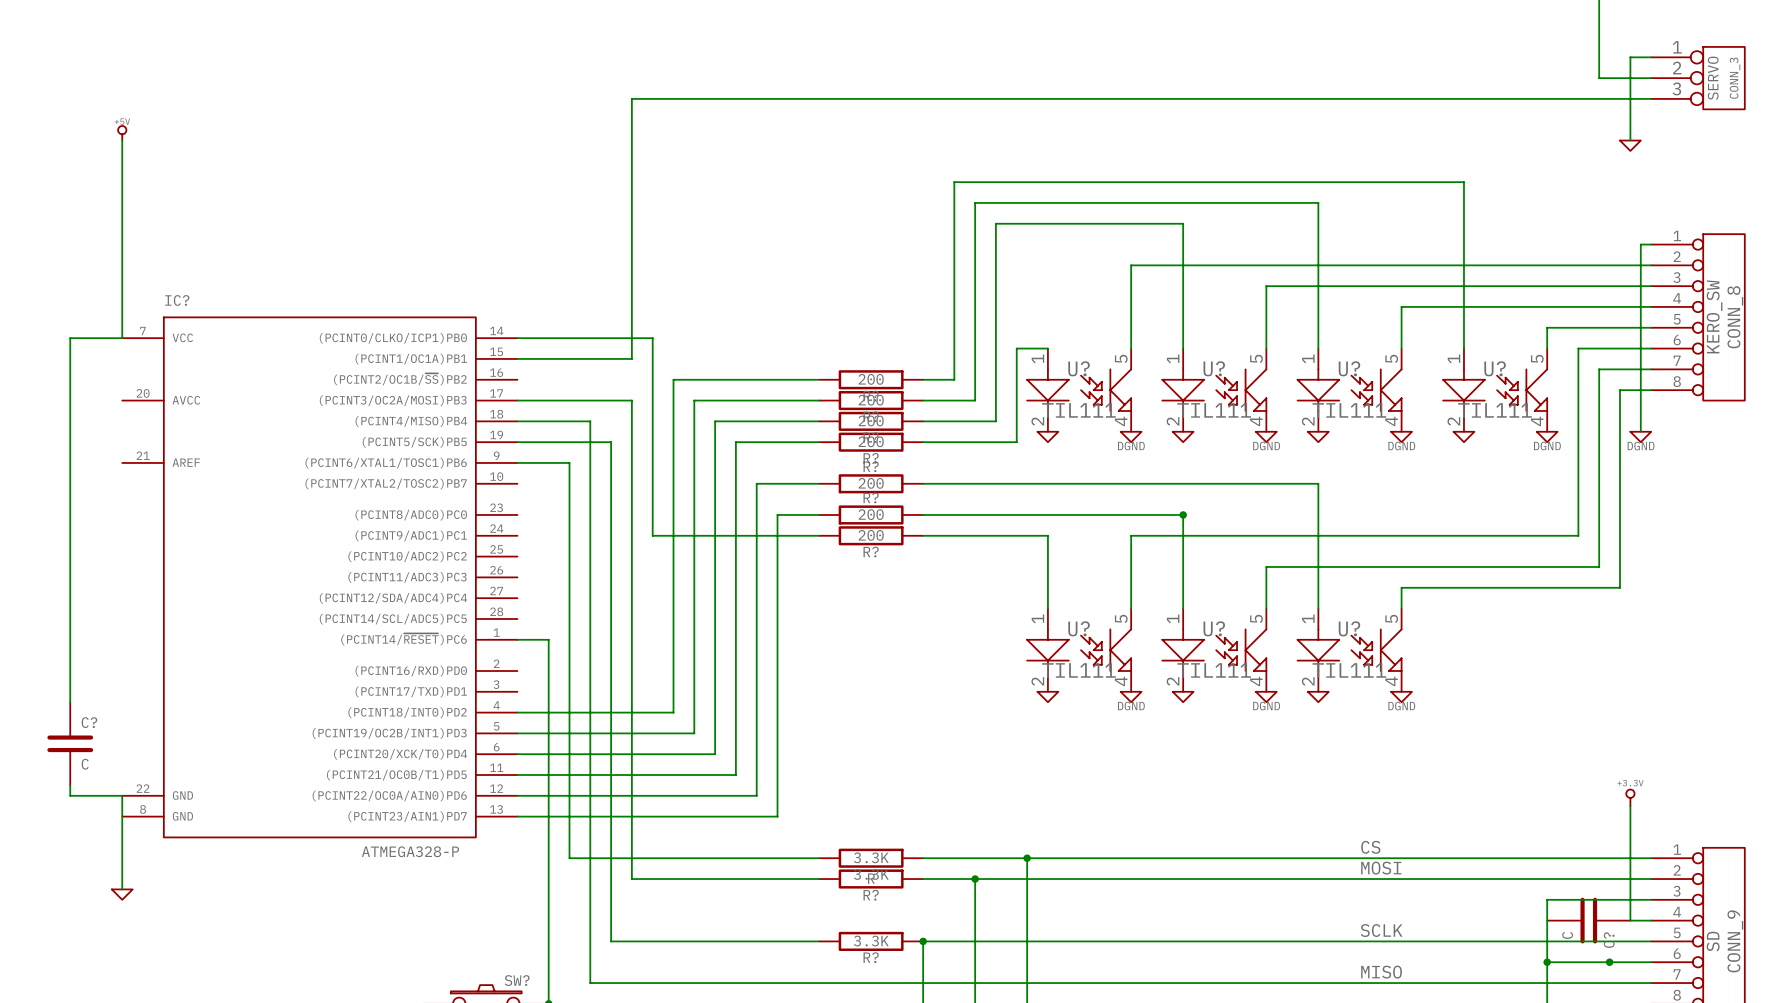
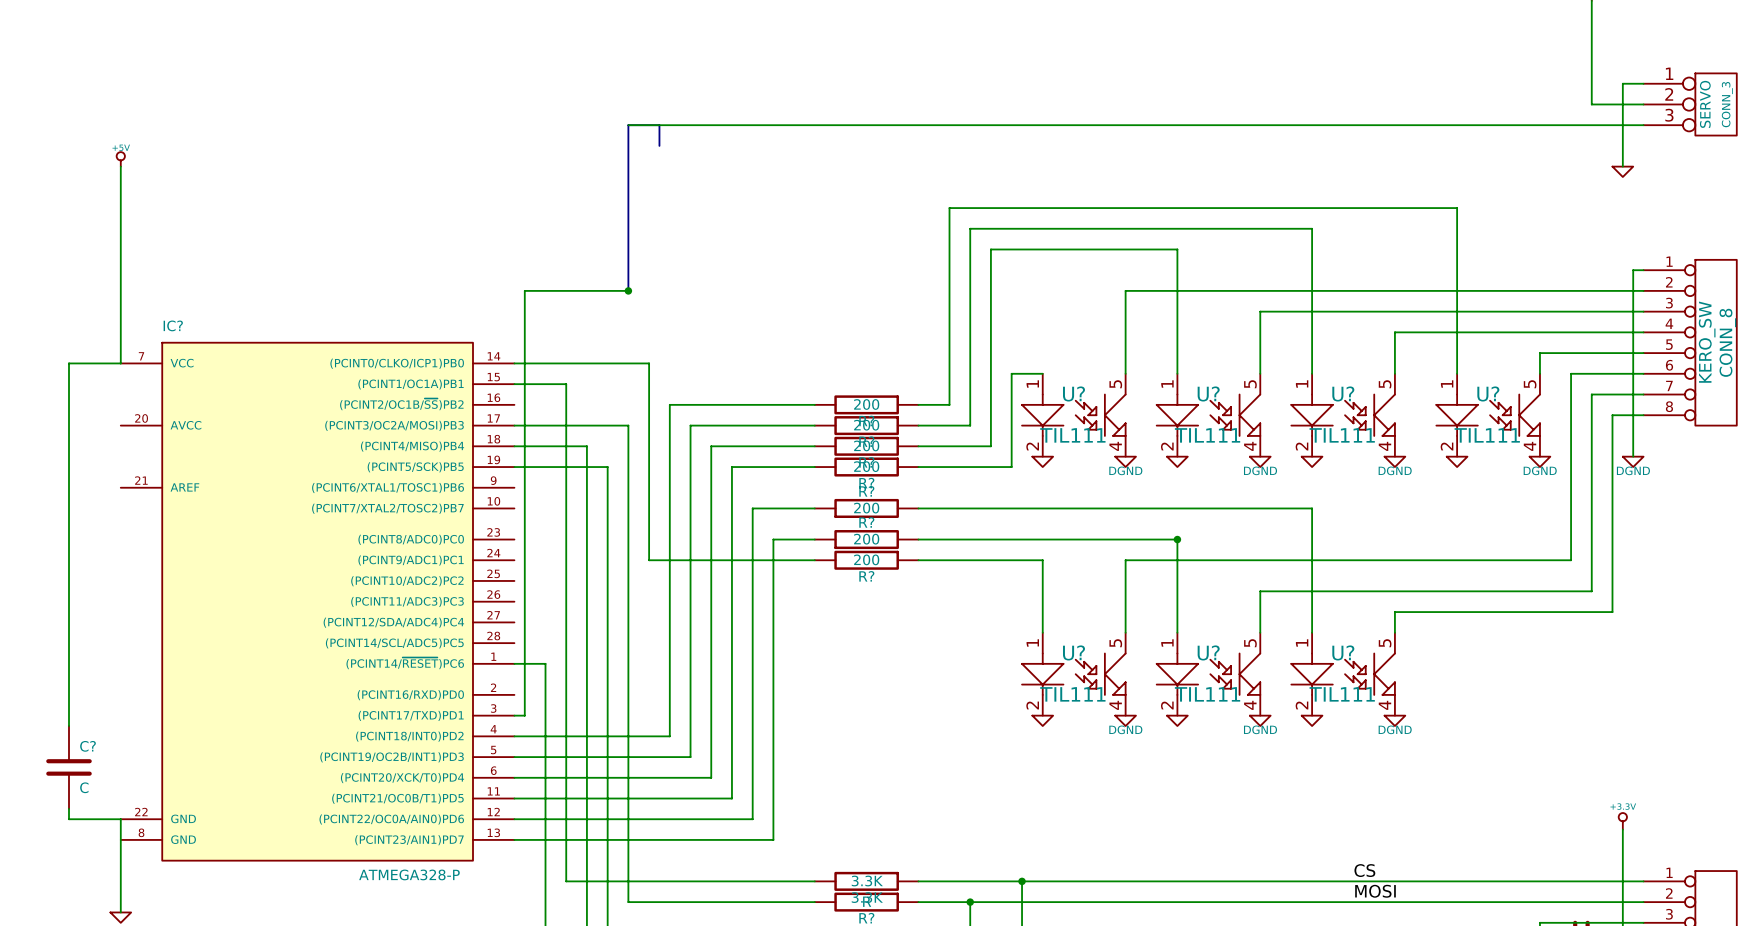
wire: (631, 98) (631, 358) (569, 358) -> none
bus: none -> (659, 145) (659, 125) (628, 125) (628, 290)
wire: none -> (628, 290) (524, 290) (524, 715) (514, 715)
junction: none -> (628, 290)
wire: (517, 462) (569, 462) -> (566, 384) (566, 487)

